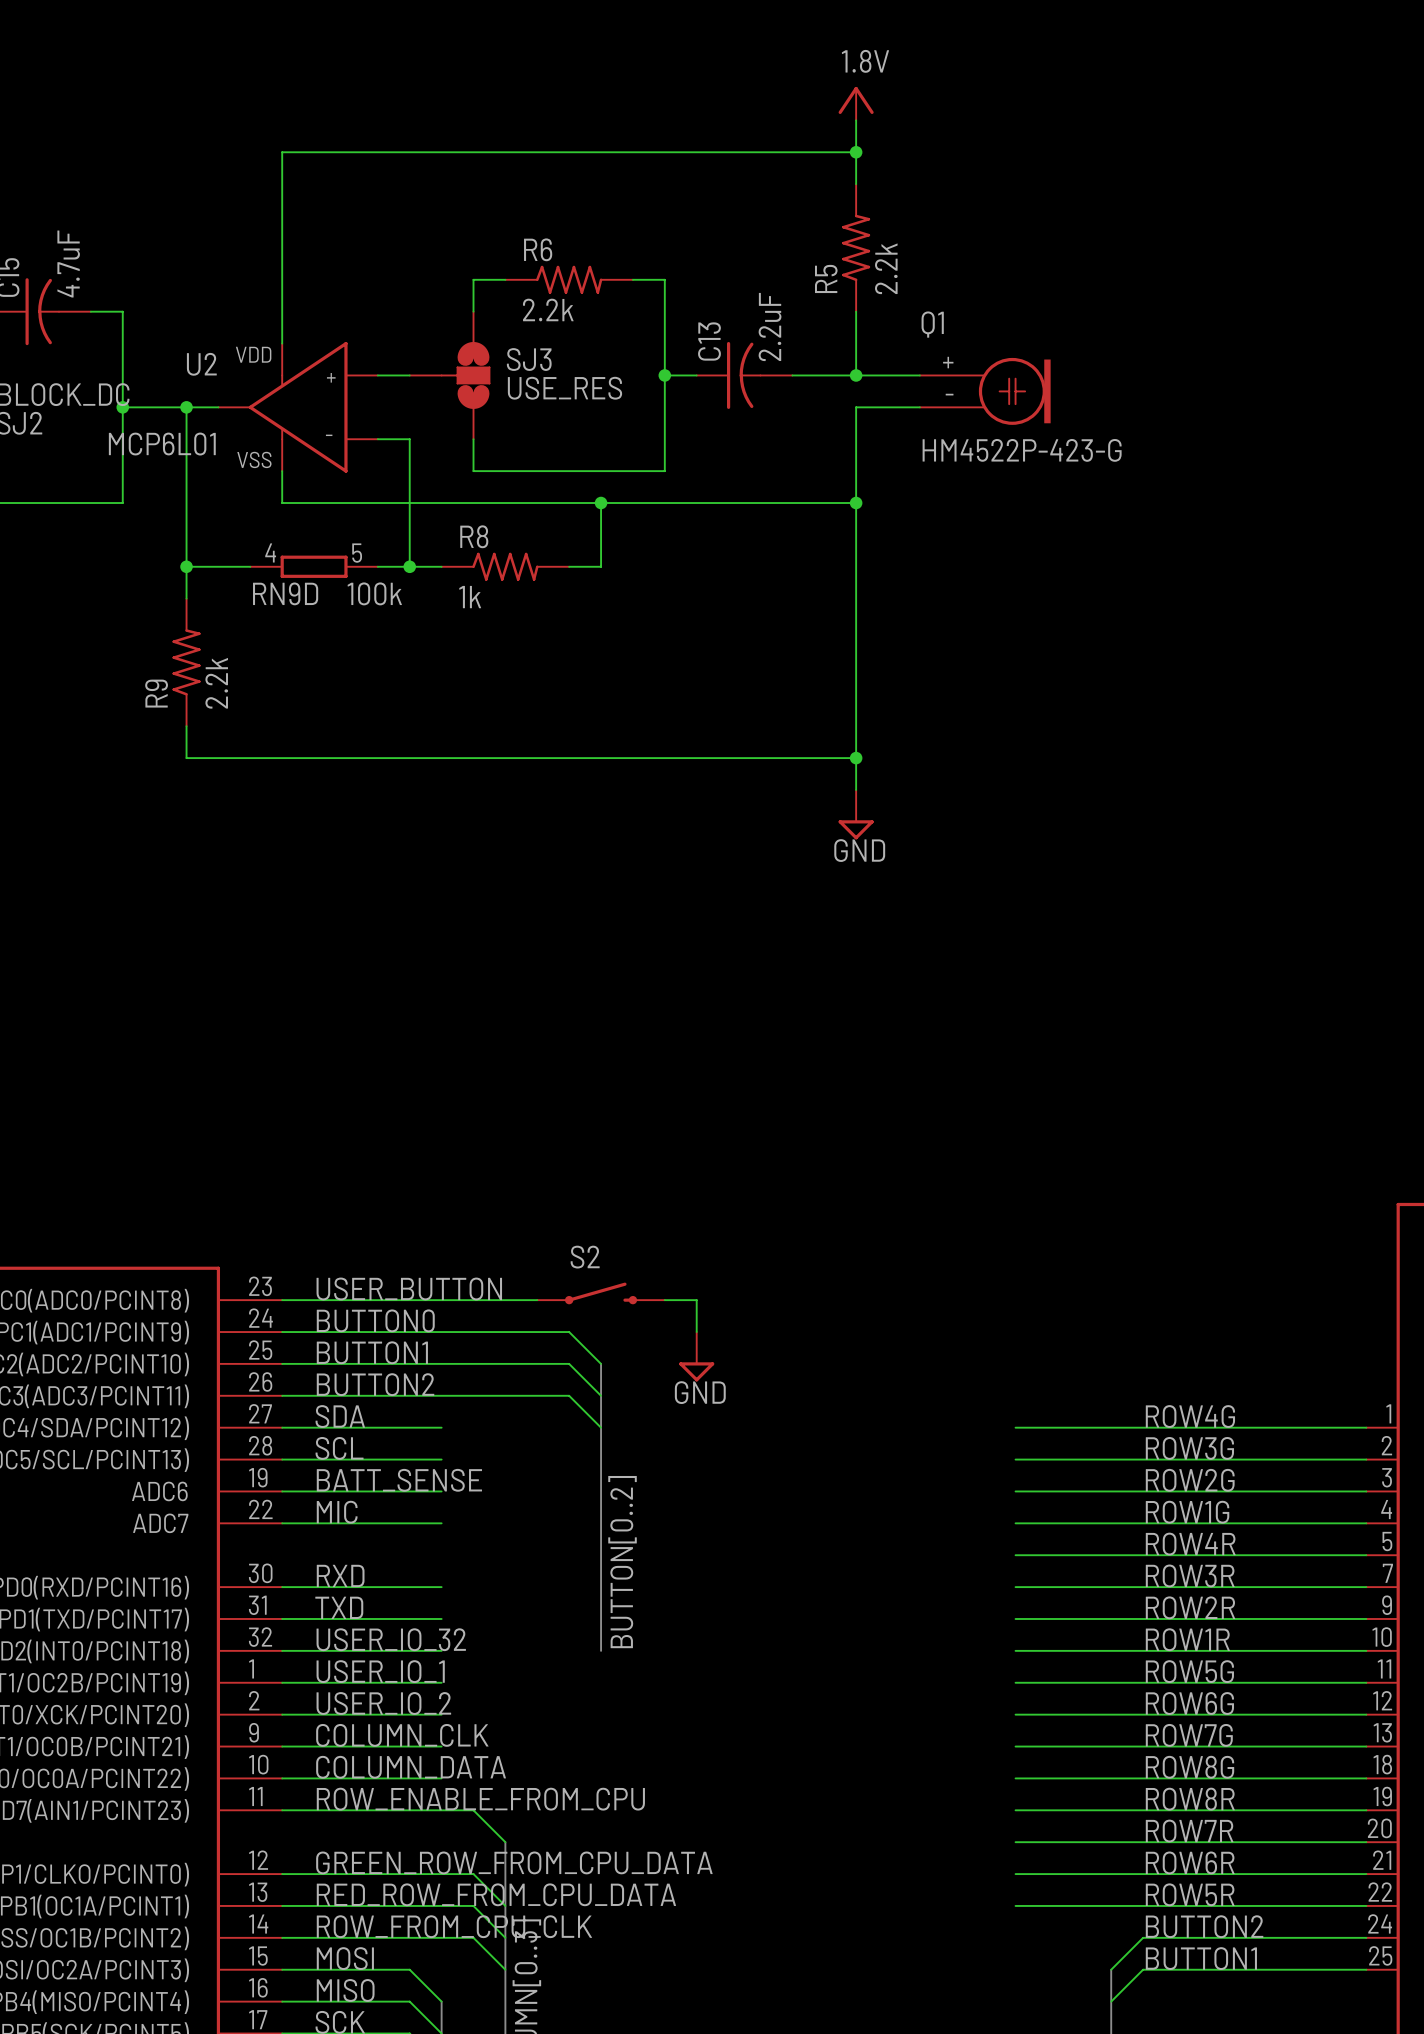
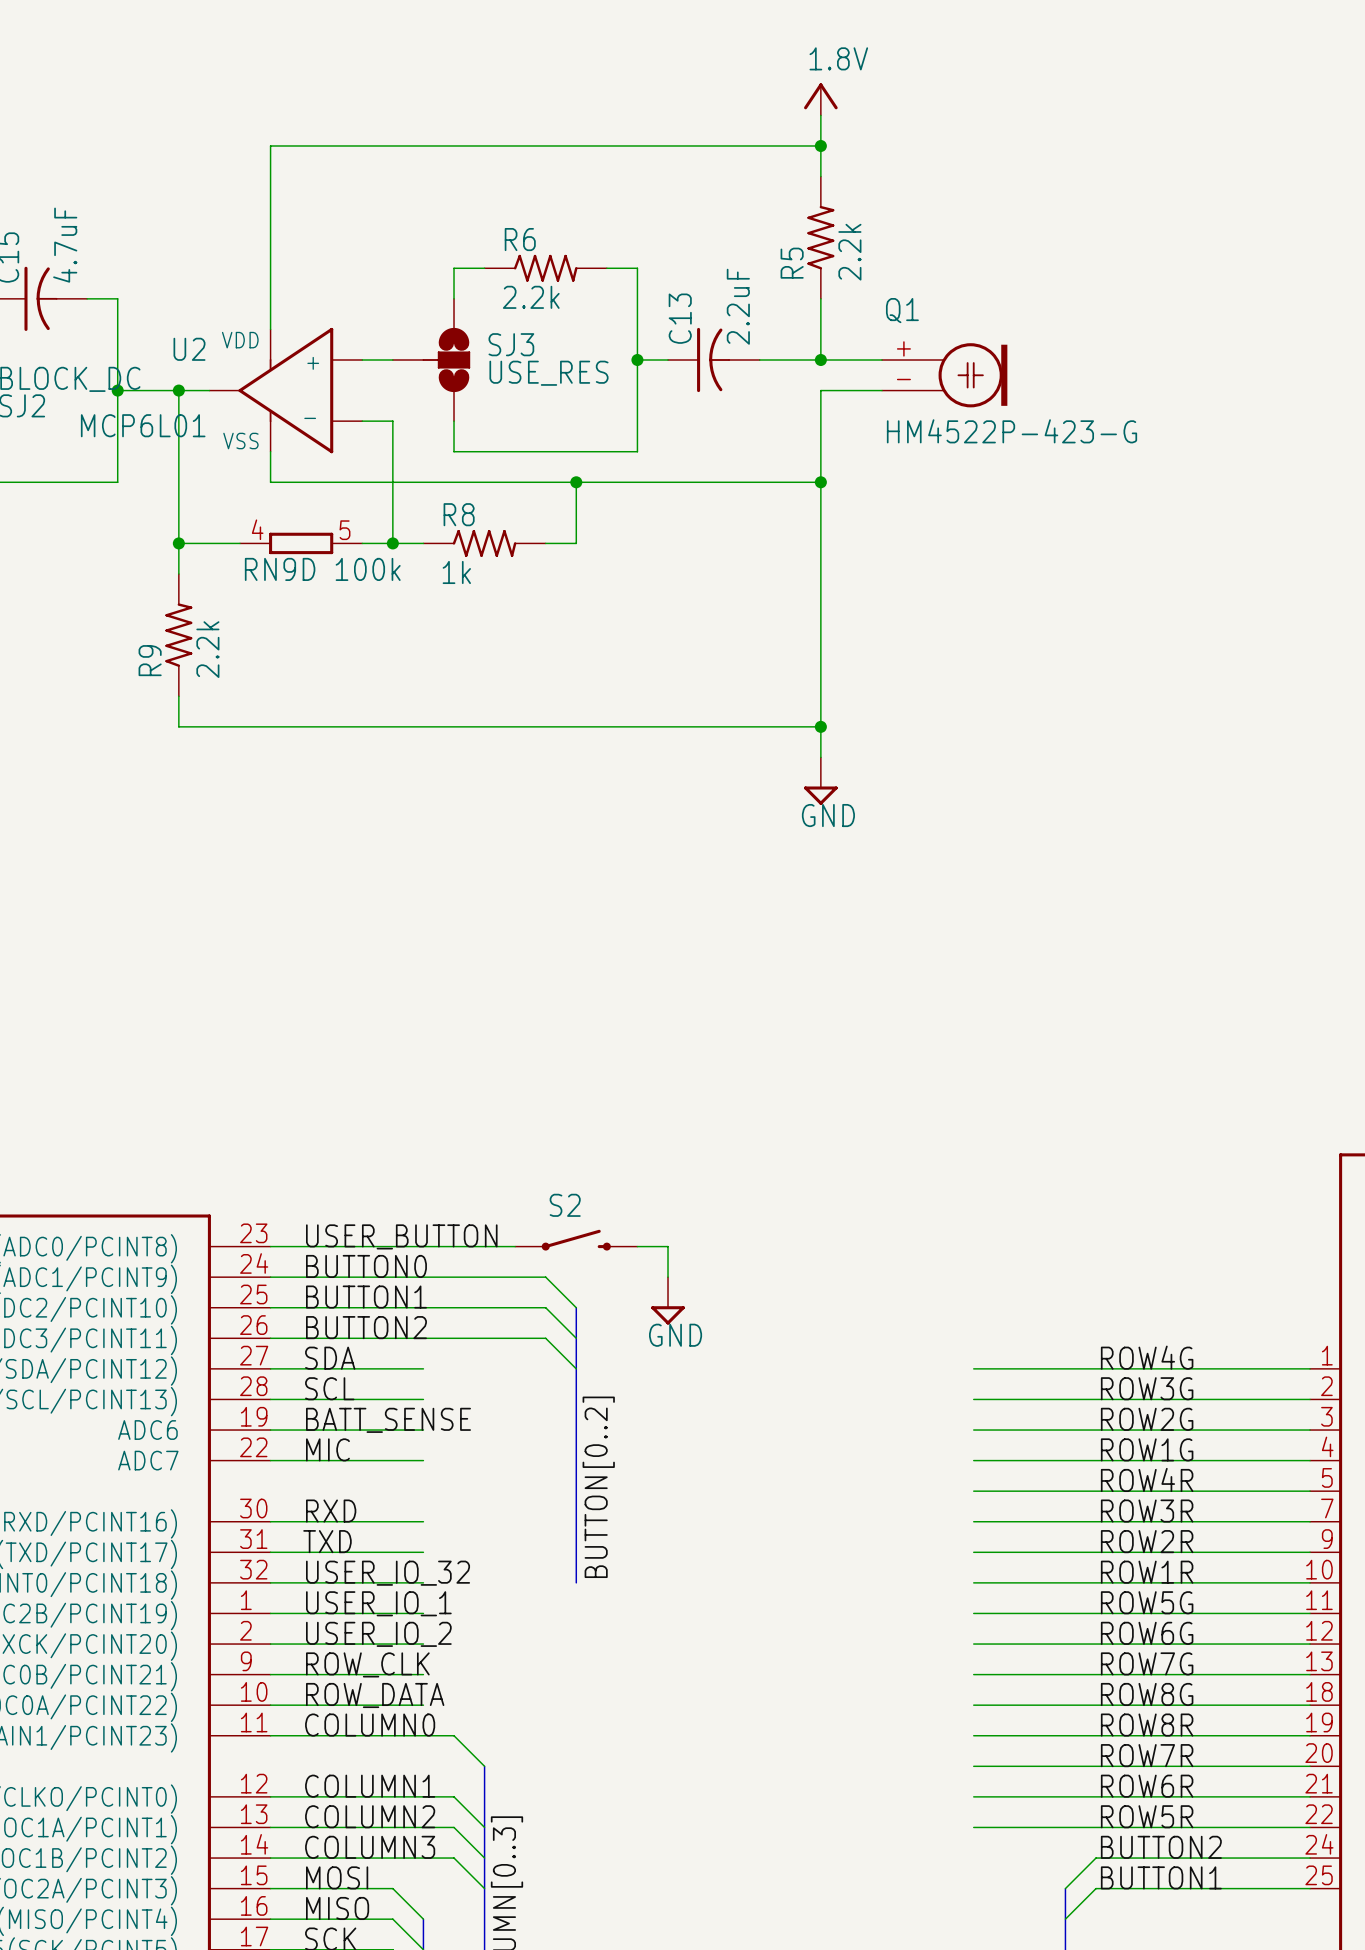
label: COLUMN_CLK (402, 1735) -> ROW_CLK (367, 1664)
label: COLUMN_DATA (411, 1767) -> ROW_DATA (375, 1695)
label: ROW_ENABLE_FROM_CPU (480, 1799) -> COLUMN0 (370, 1725)
label: GREEN_ROW_FROM_CPU_DATA (514, 1862) -> COLUMN1 (370, 1786)
label: RED_ROW_FROM_CPU_DATA (496, 1894) -> COLUMN2 (370, 1816)
label: ROW_FROM_CPU_CLK (454, 1926) -> COLUMN3 (370, 1847)

